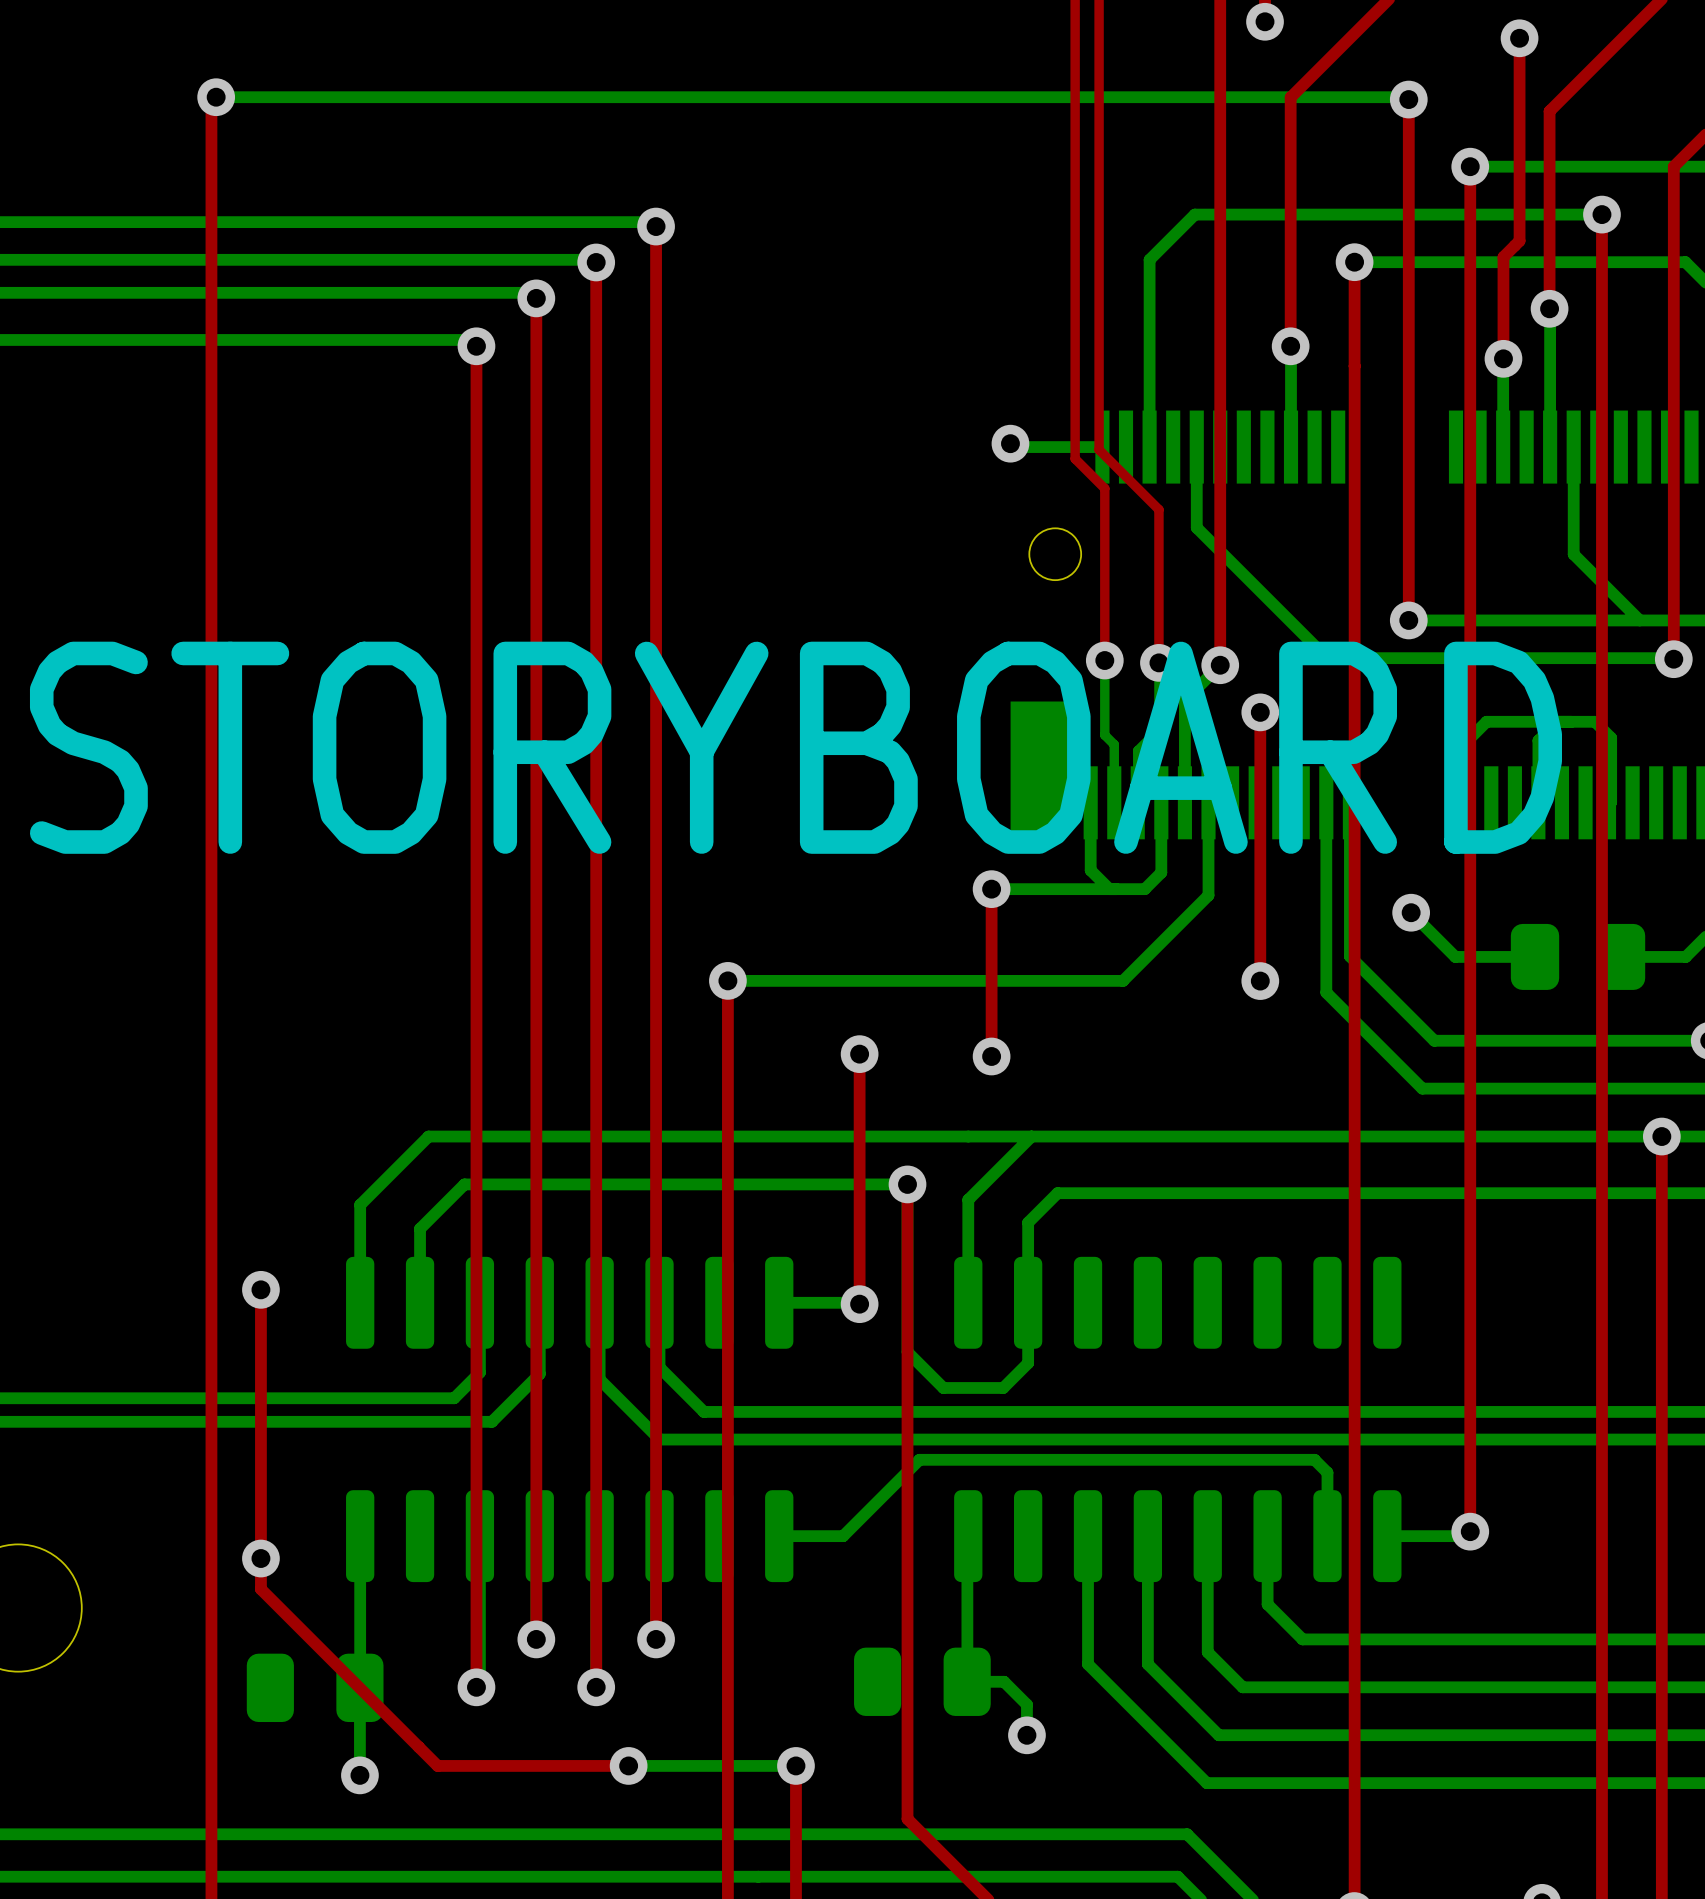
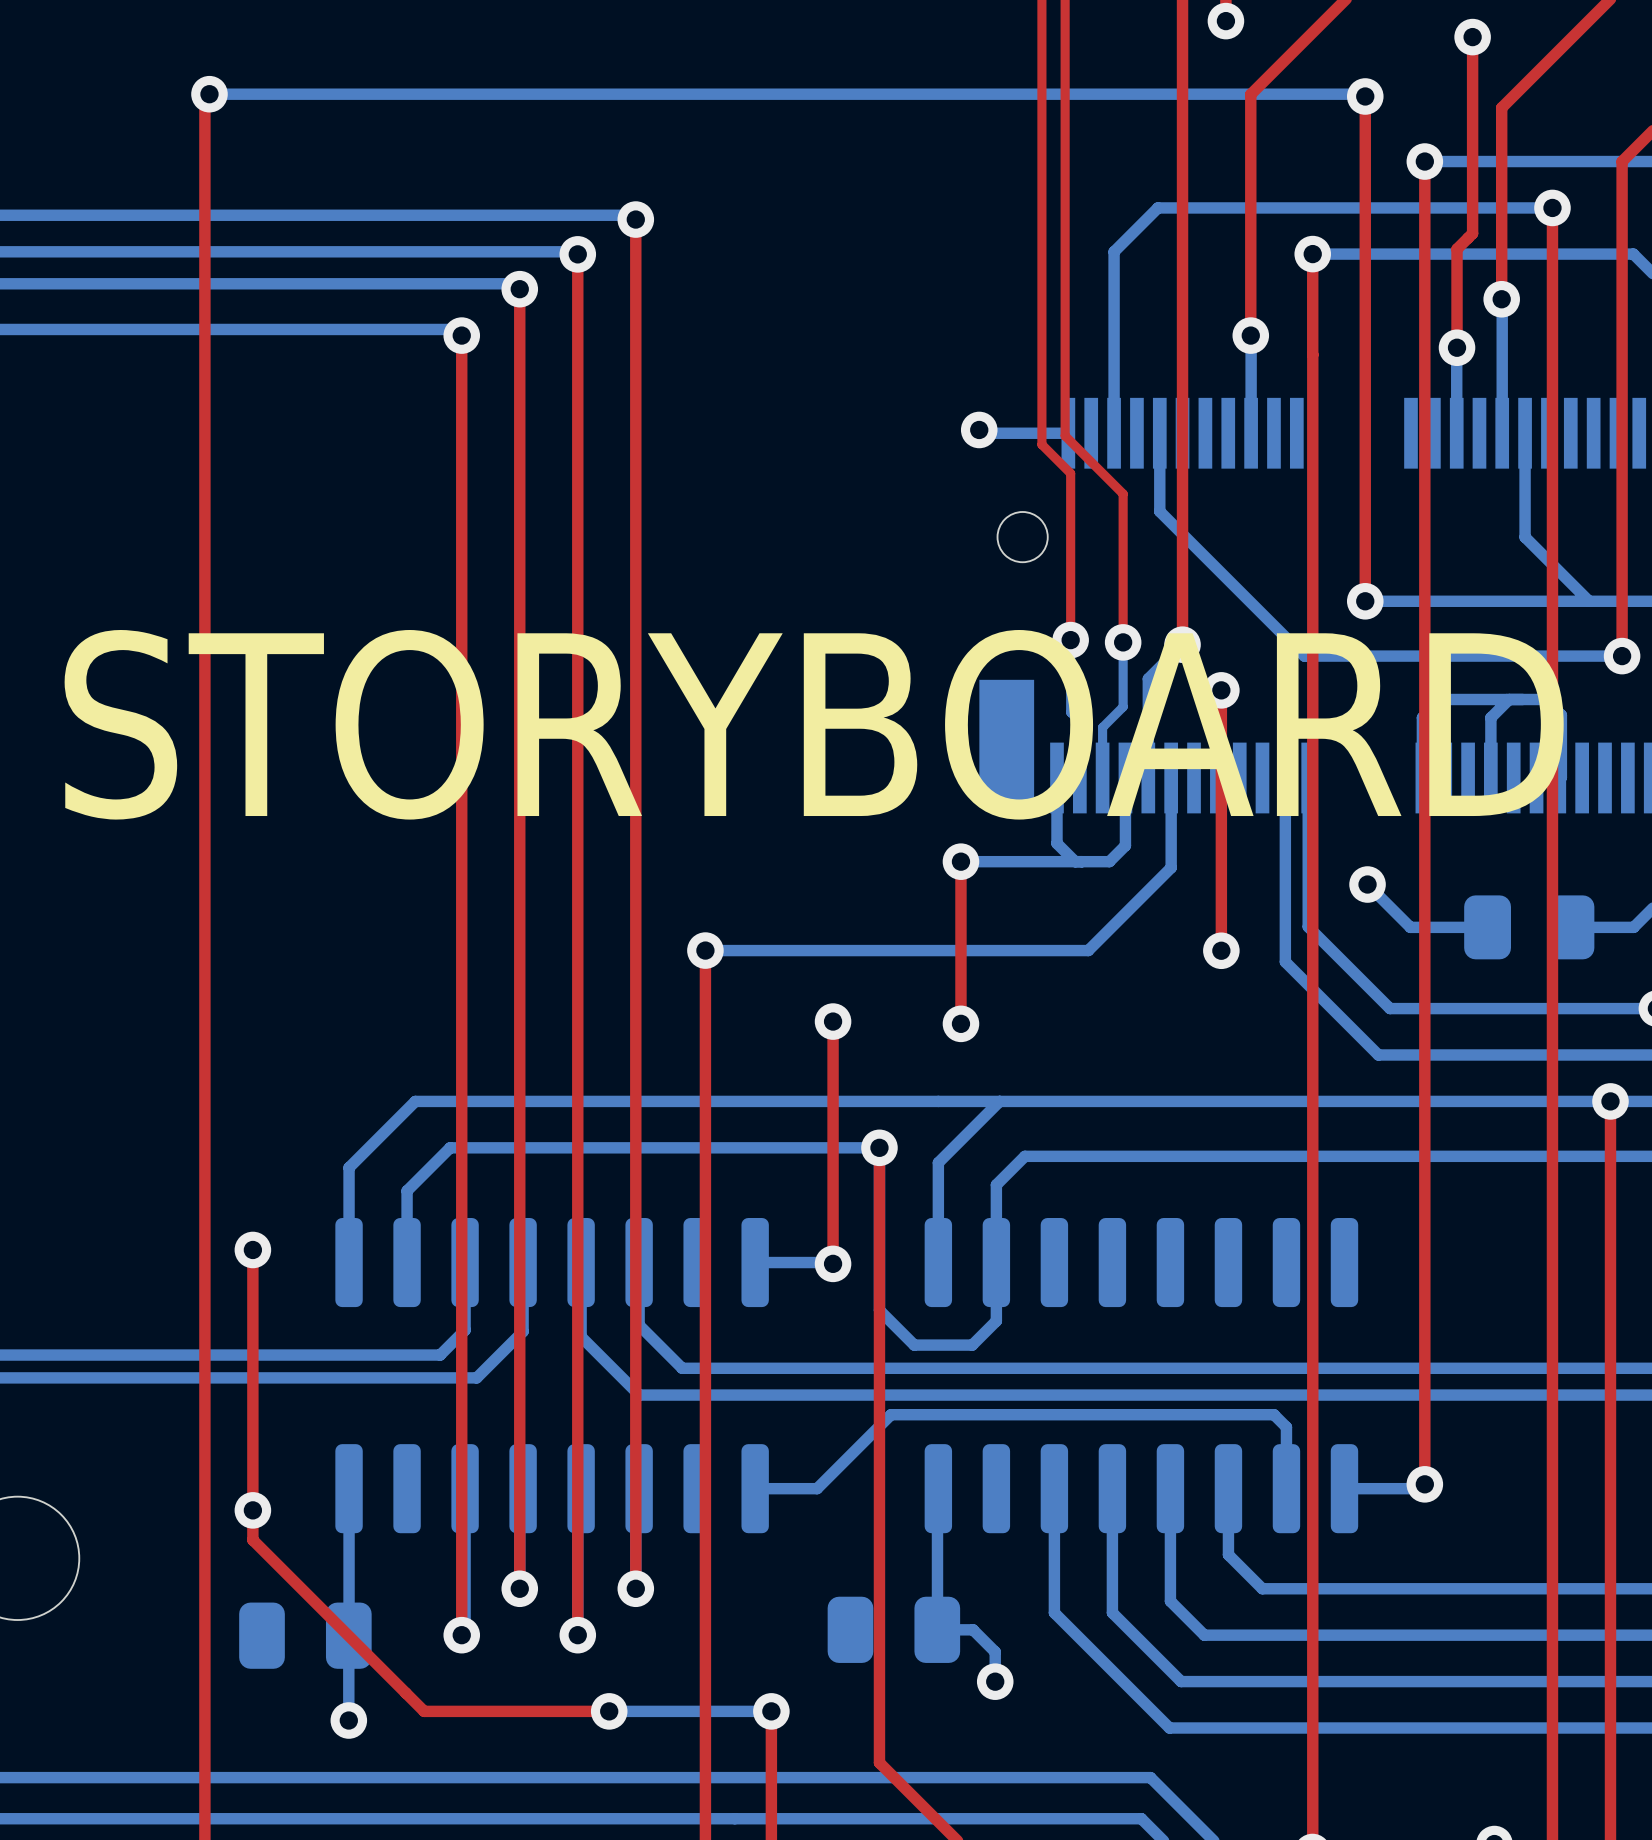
bottom track: (1327, 658) (1673, 659) -> (1286, 637) (1304, 656) (1622, 656)
via position: (1673, 659) -> (1622, 656)

